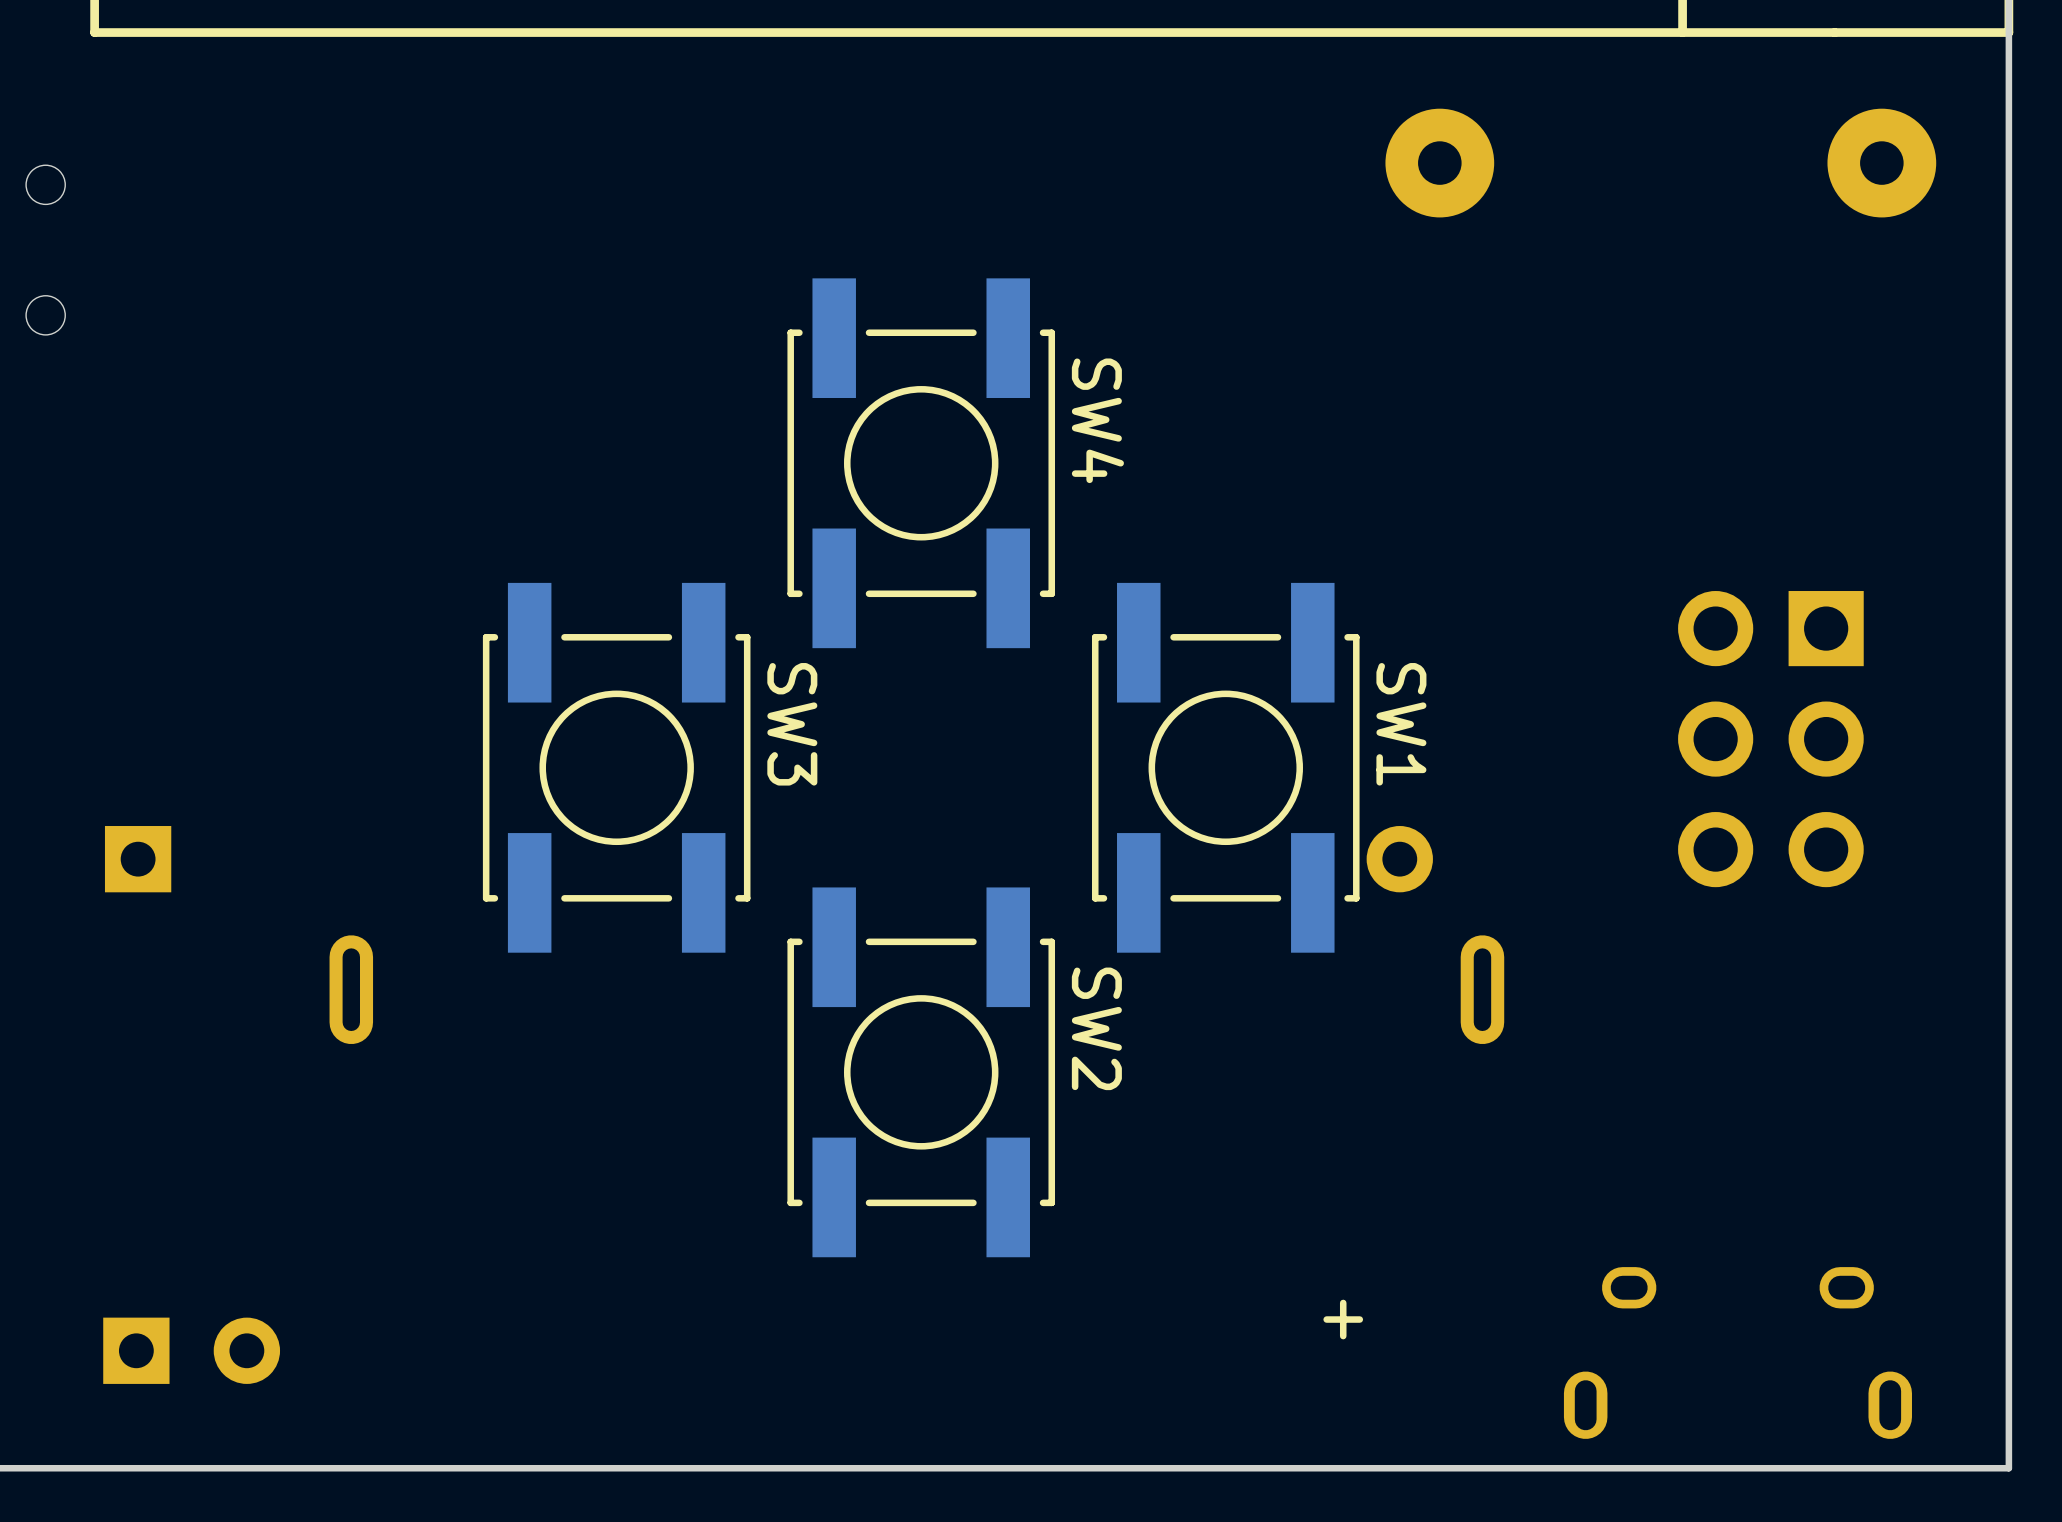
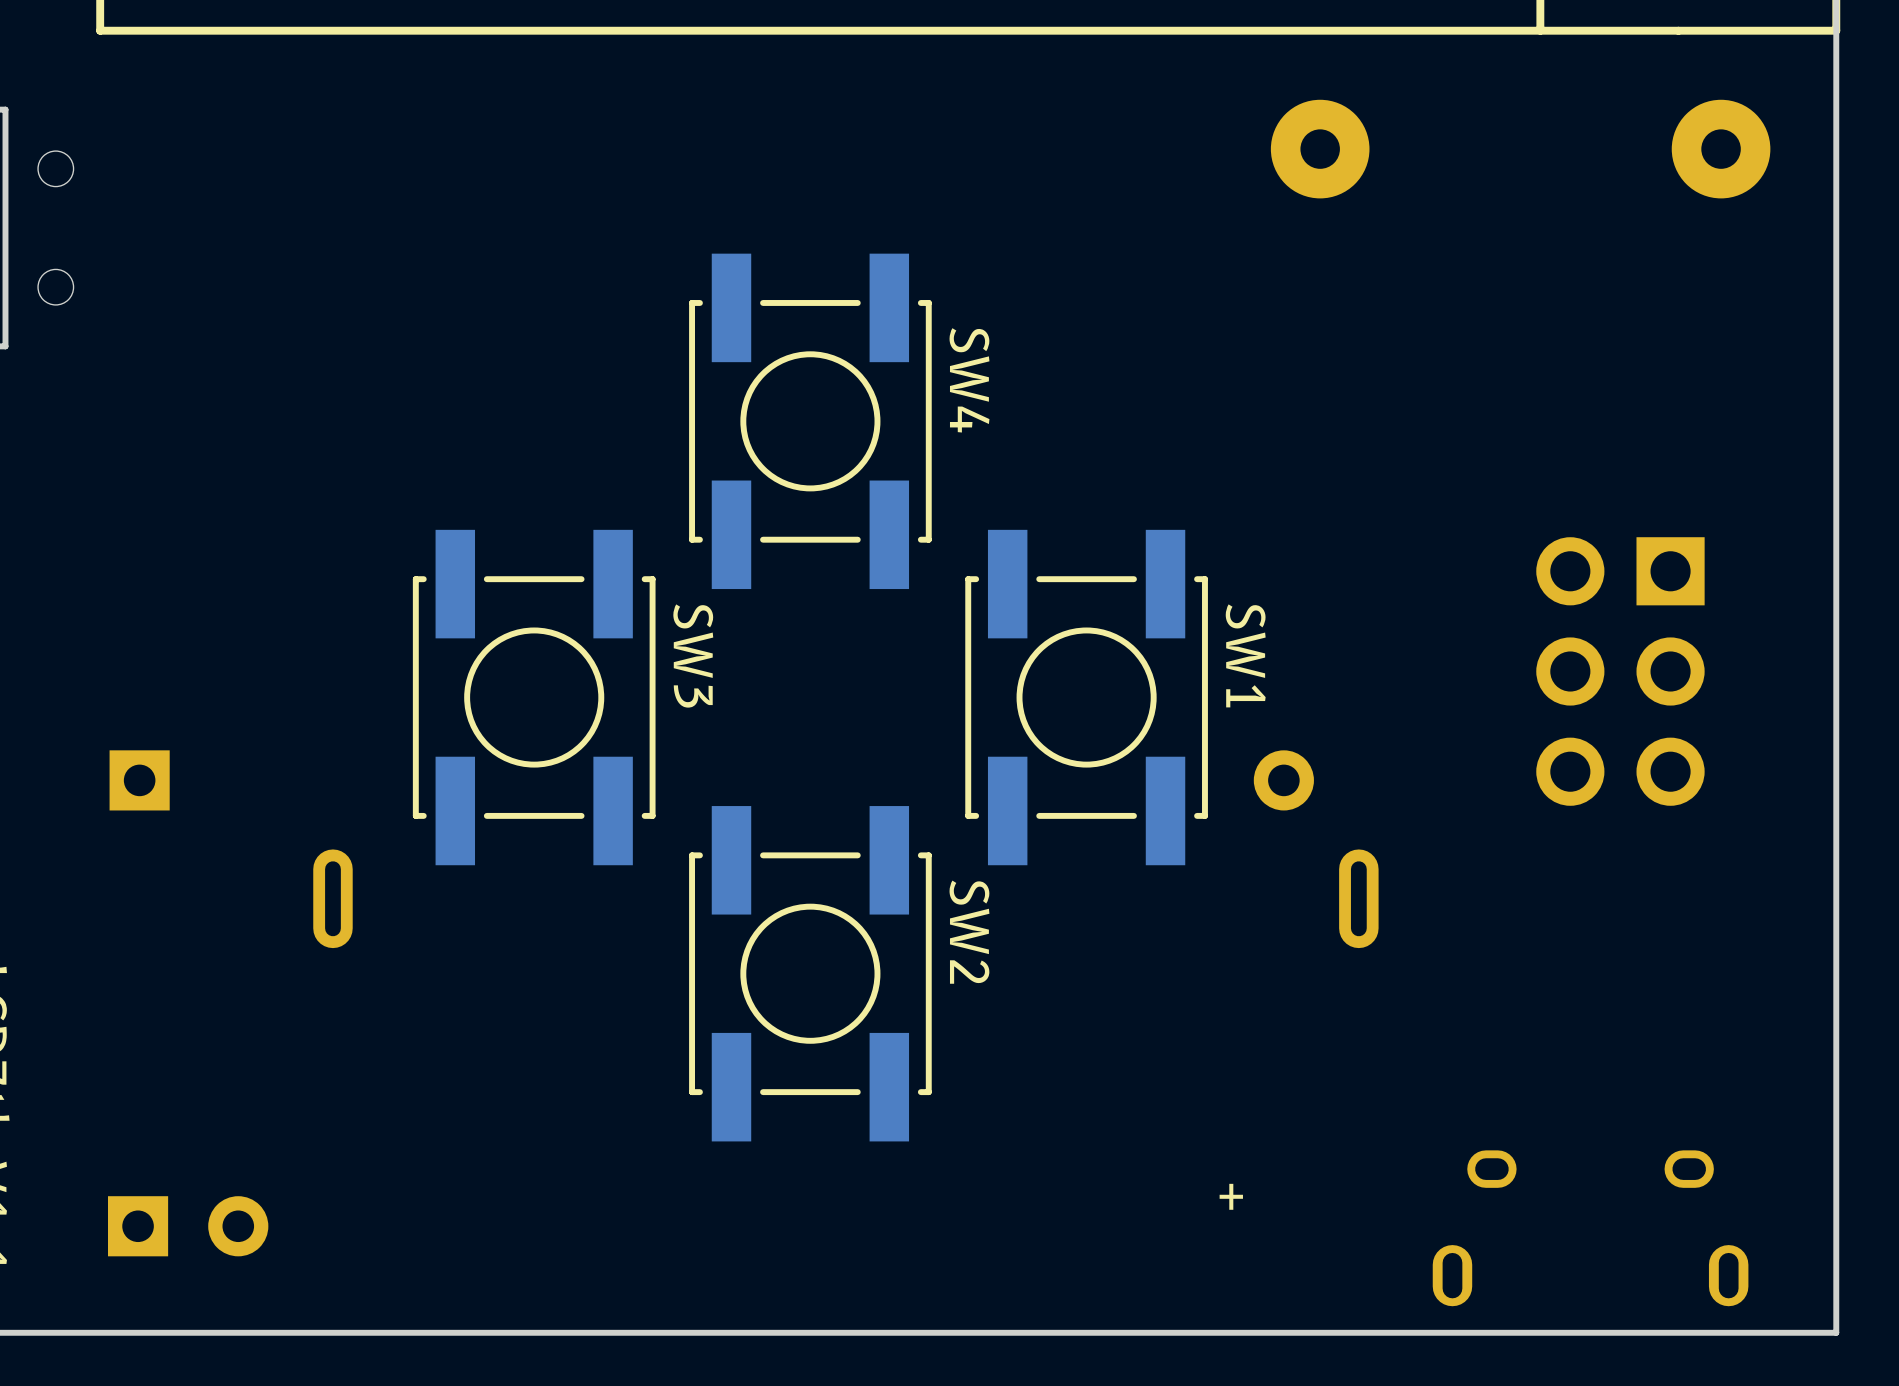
SW4 position: (921, 463) -> (810, 421)
SW3 position: (616, 767) -> (534, 697)
SW1 position: (1225, 767) -> (1086, 697)
SW2 position: (921, 1072) -> (810, 973)

